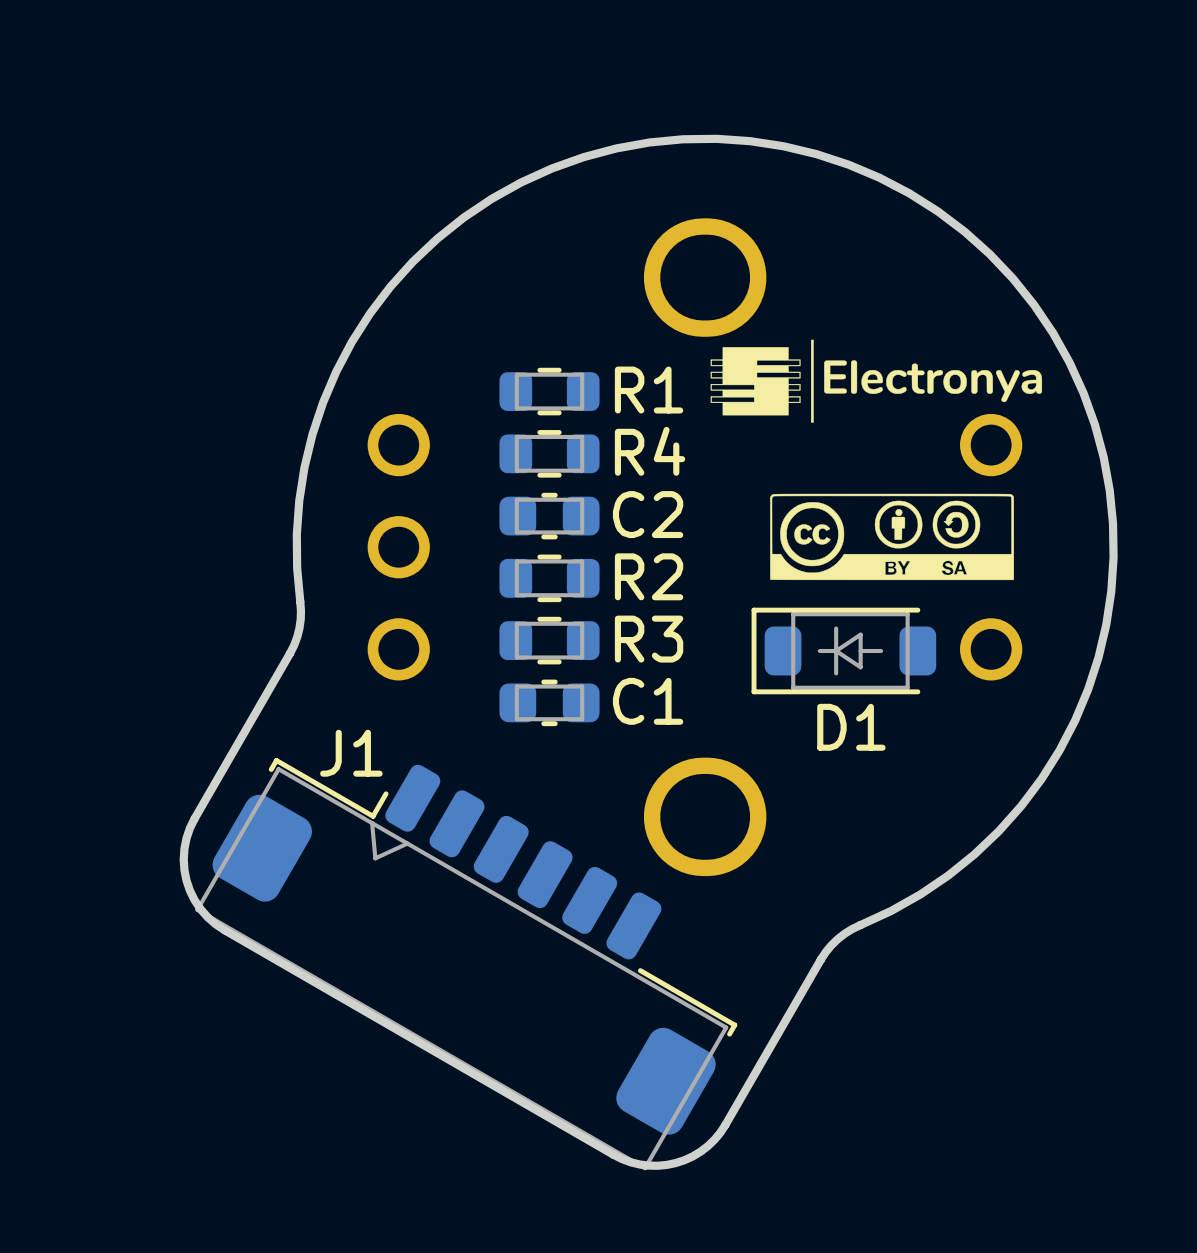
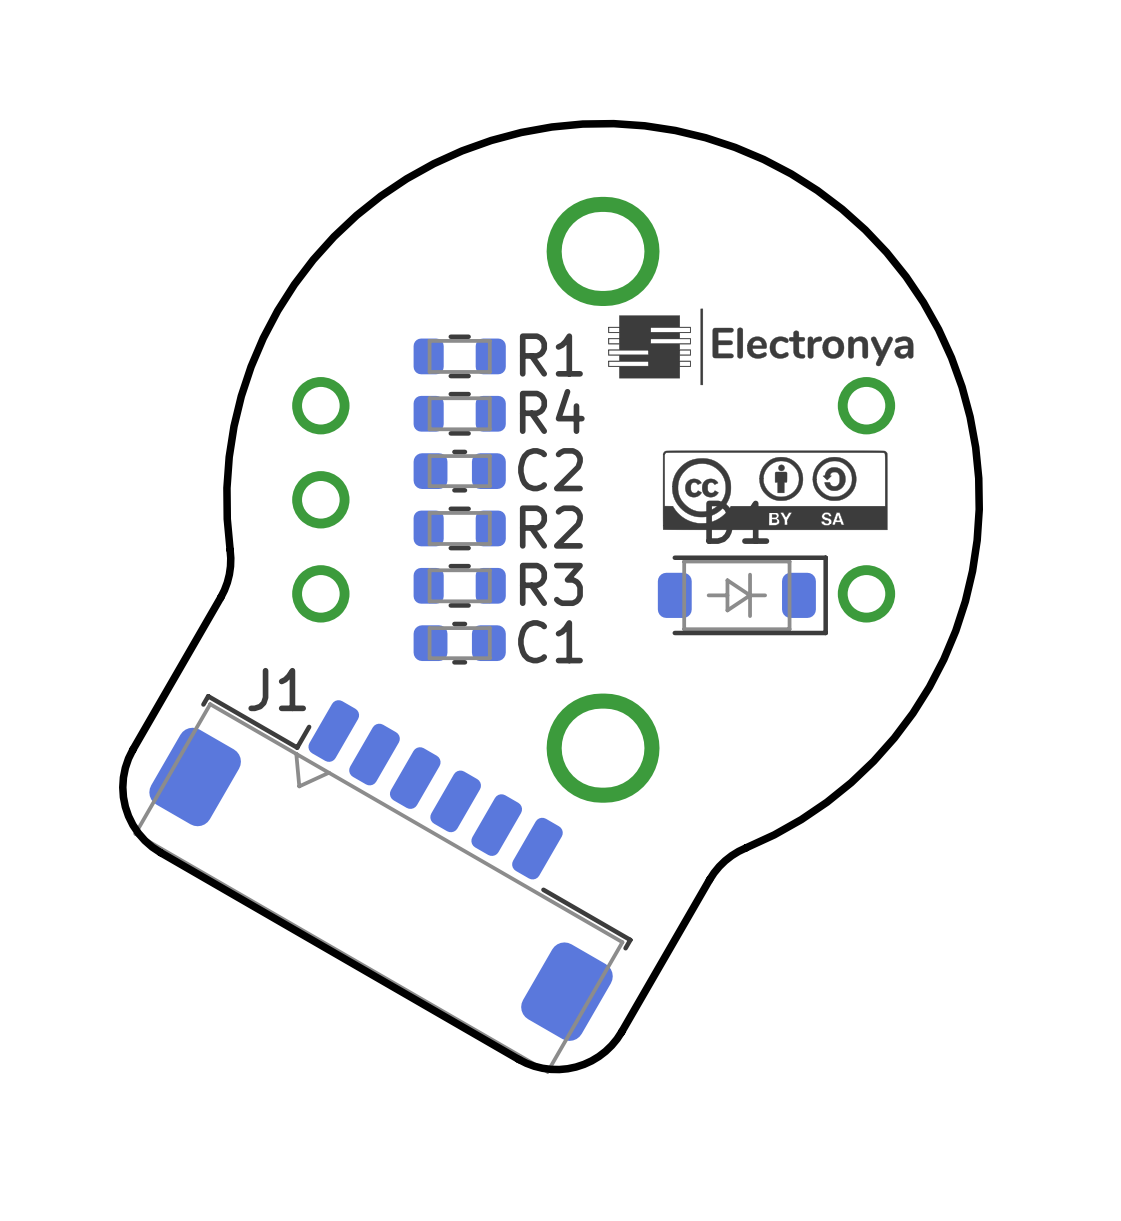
D1 rotation: 0° (843, 650) -> 180° (742, 595)

